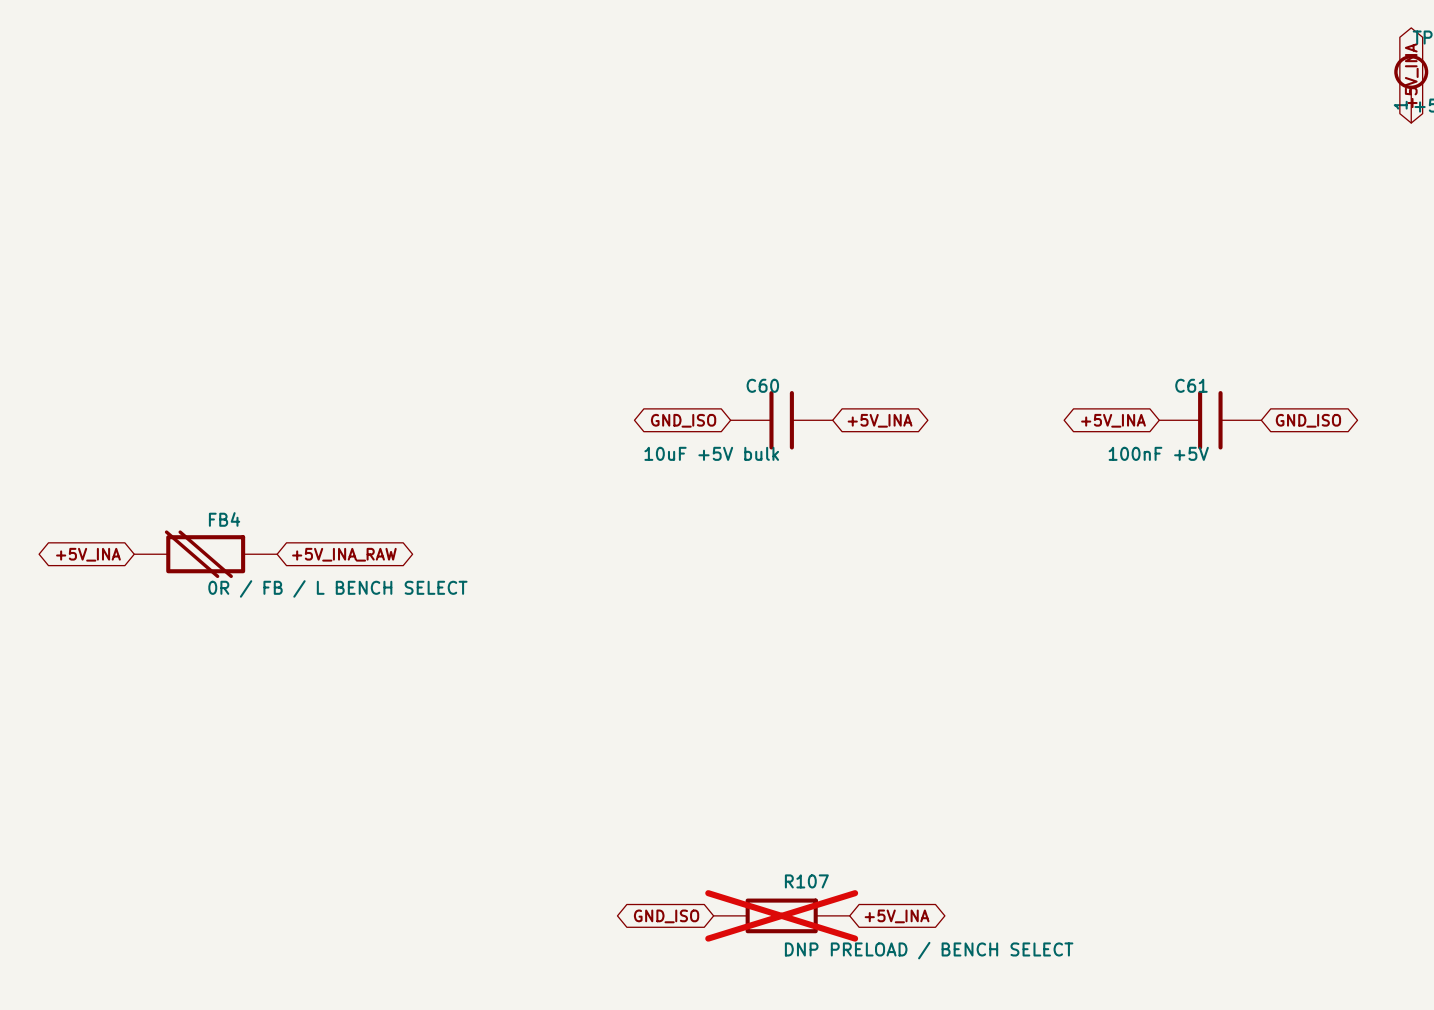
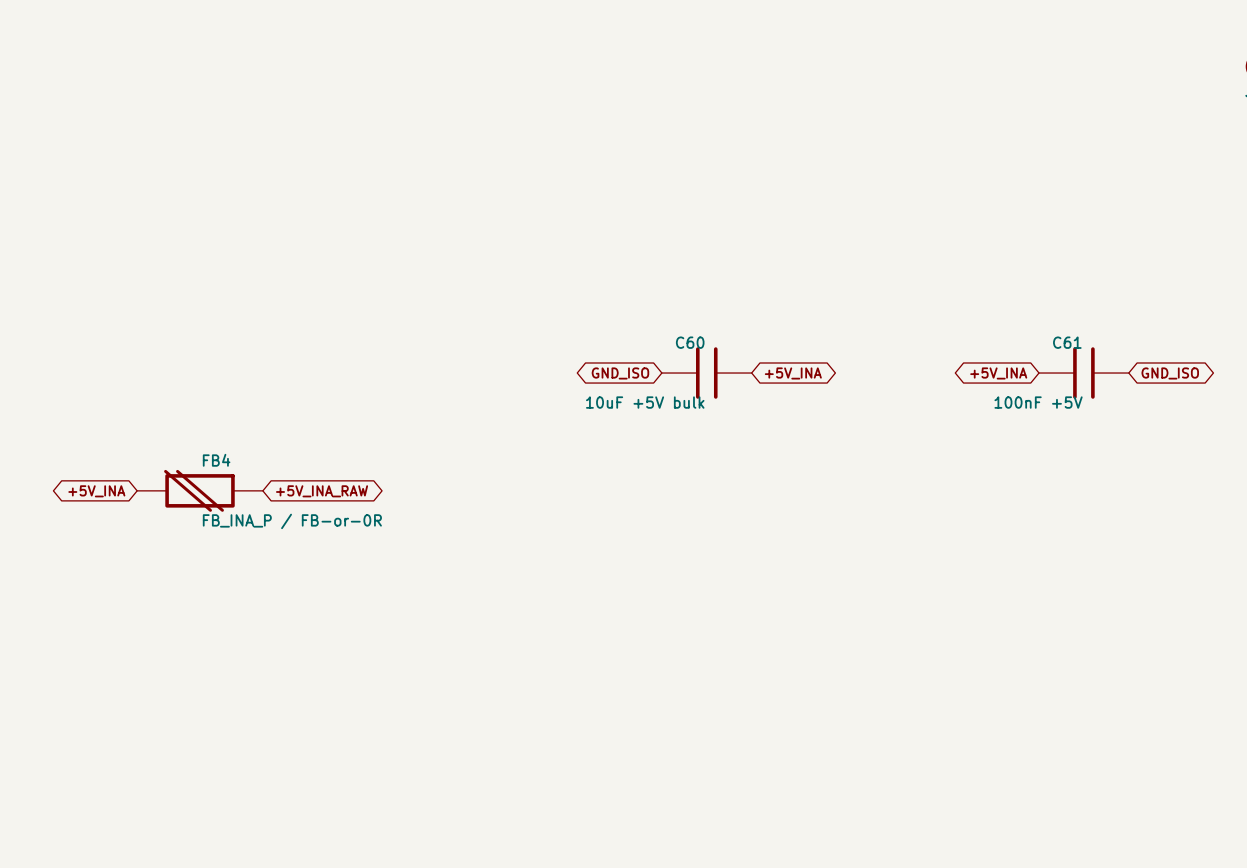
FB4 value: 0R / FB / L BENCH SELECT (337, 588) -> FB_INA_P / FB-or-0R (292, 521)
R107: DNP PRELOAD / BENCH SELECT (781, 915) -> none
global label: GND_ISO (666, 916) -> none
global label: +5V_INA (897, 916) -> none

